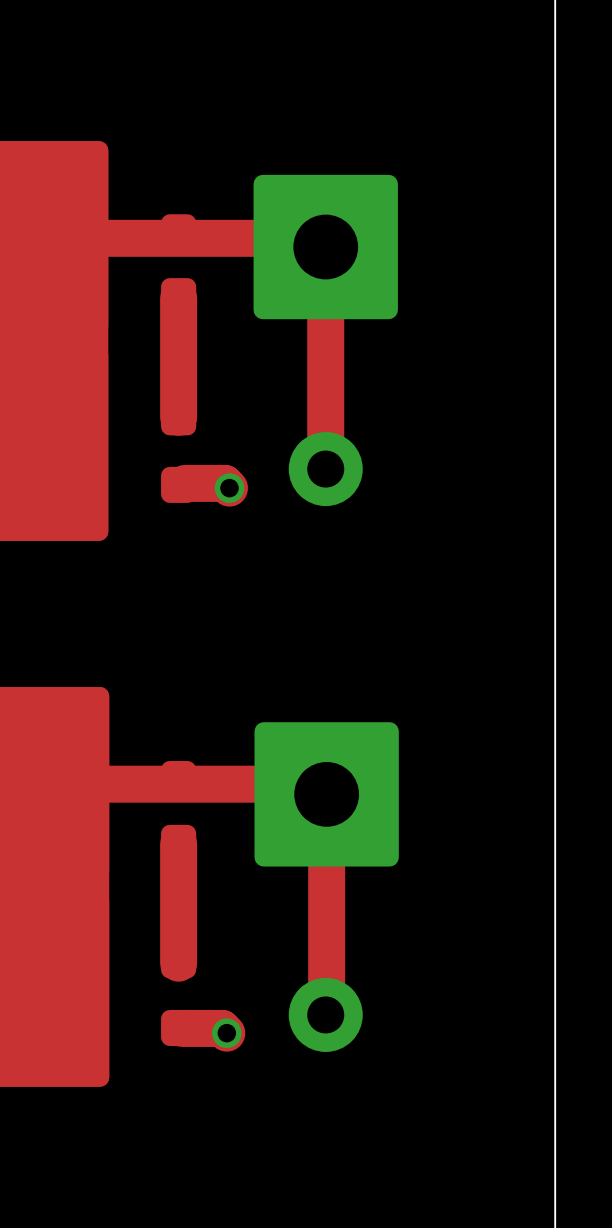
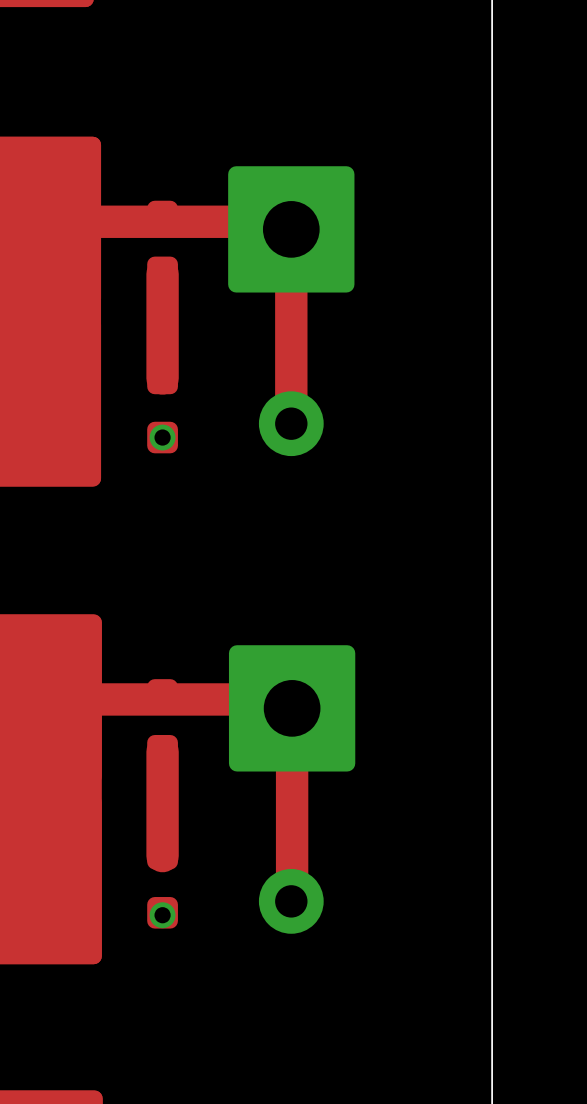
top track: (185, 483) (224, 483) (229, 488) -> none
via position: (229, 488) -> (162, 437)
top track: (182, 1028) (222, 1028) (226, 1033) -> none
via position: (226, 1033) -> (162, 915)

